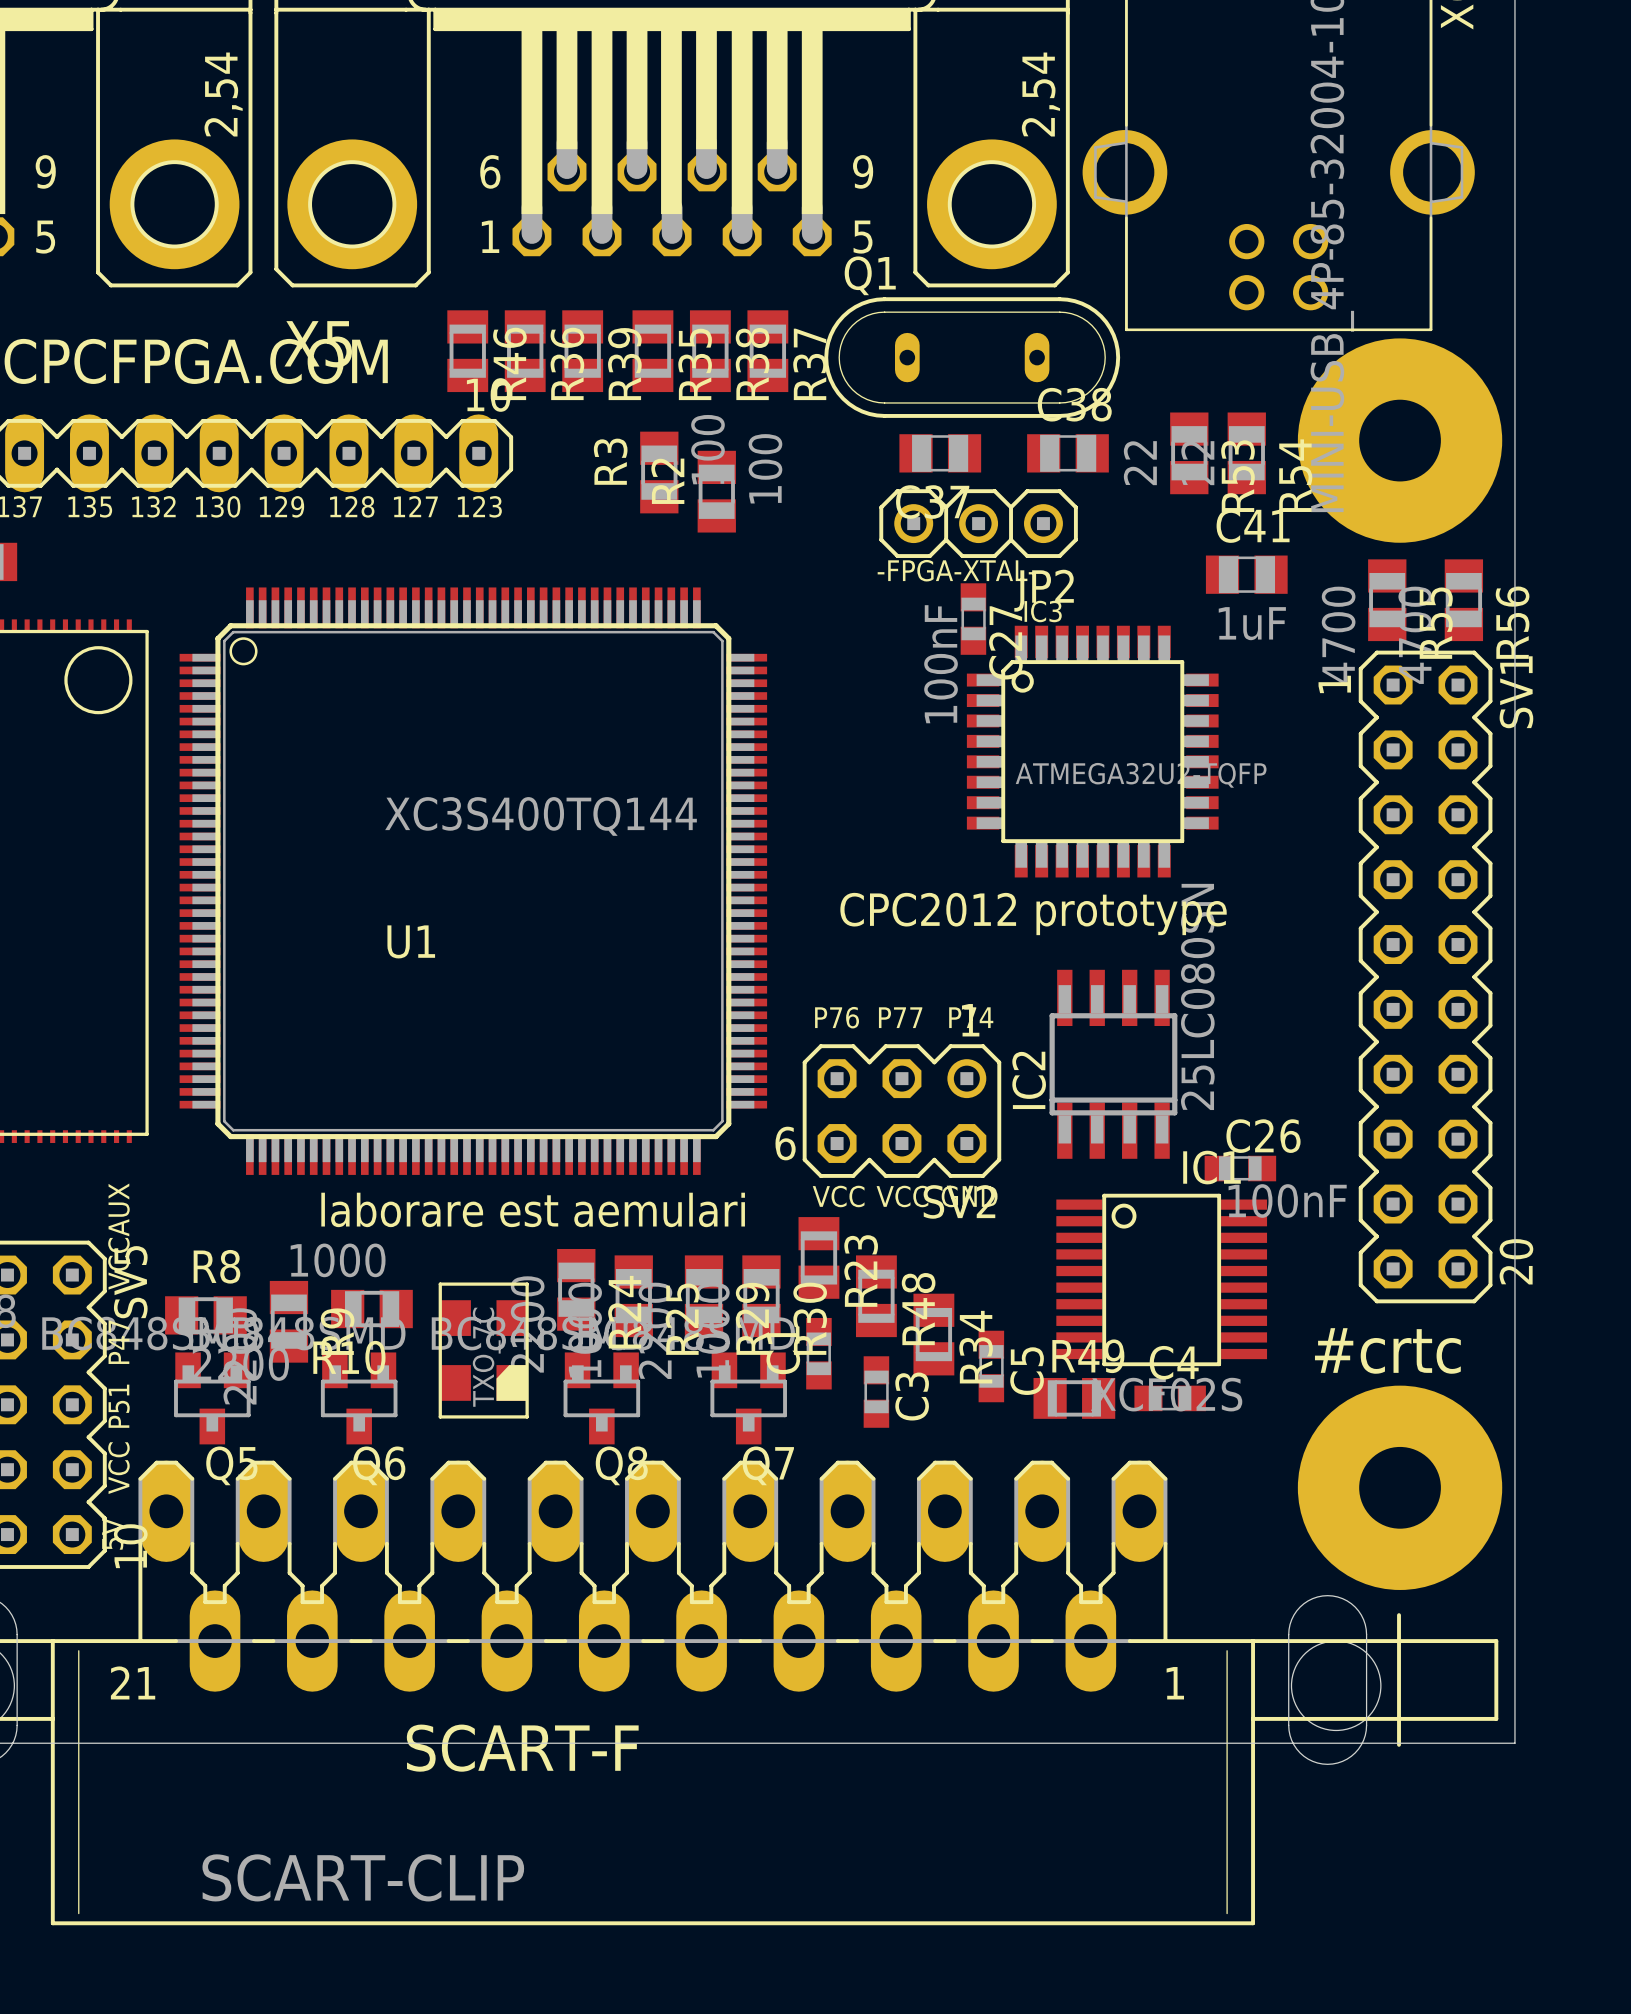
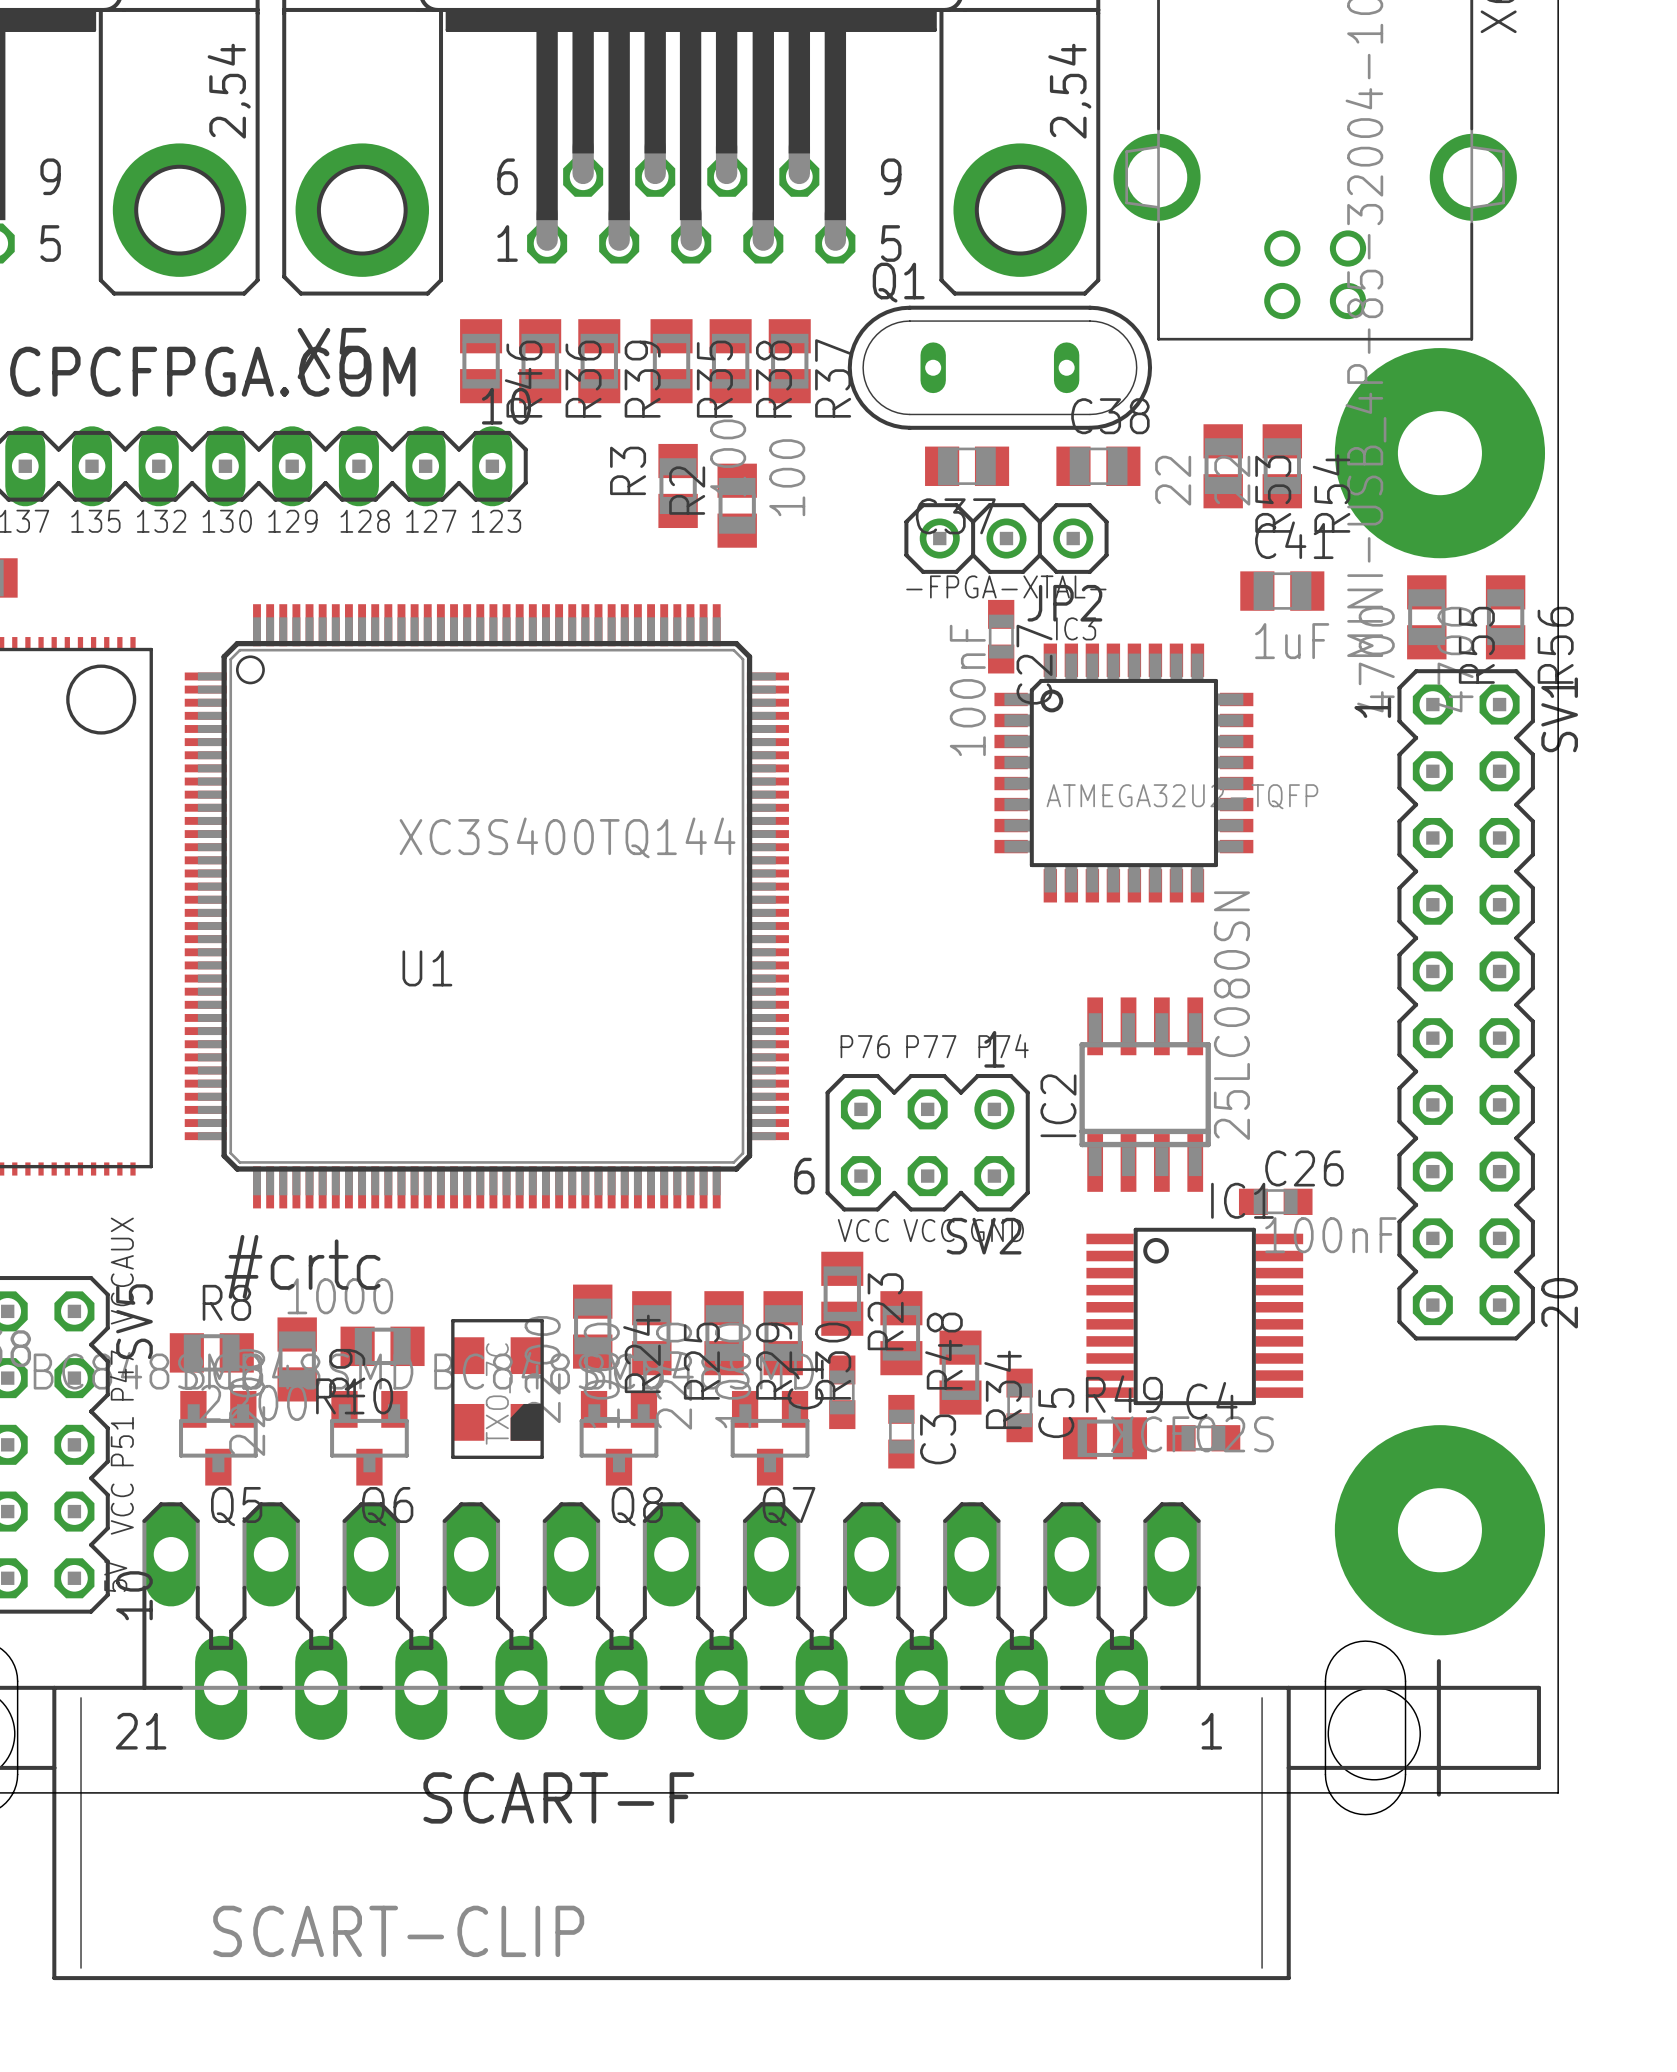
text: CPC2012 prototype (1033, 914) -> none
text: laborare est aemulari (533, 1209) -> none
text: none -> #crtc (302, 1266)
text: #crtc (1387, 1350) -> none

